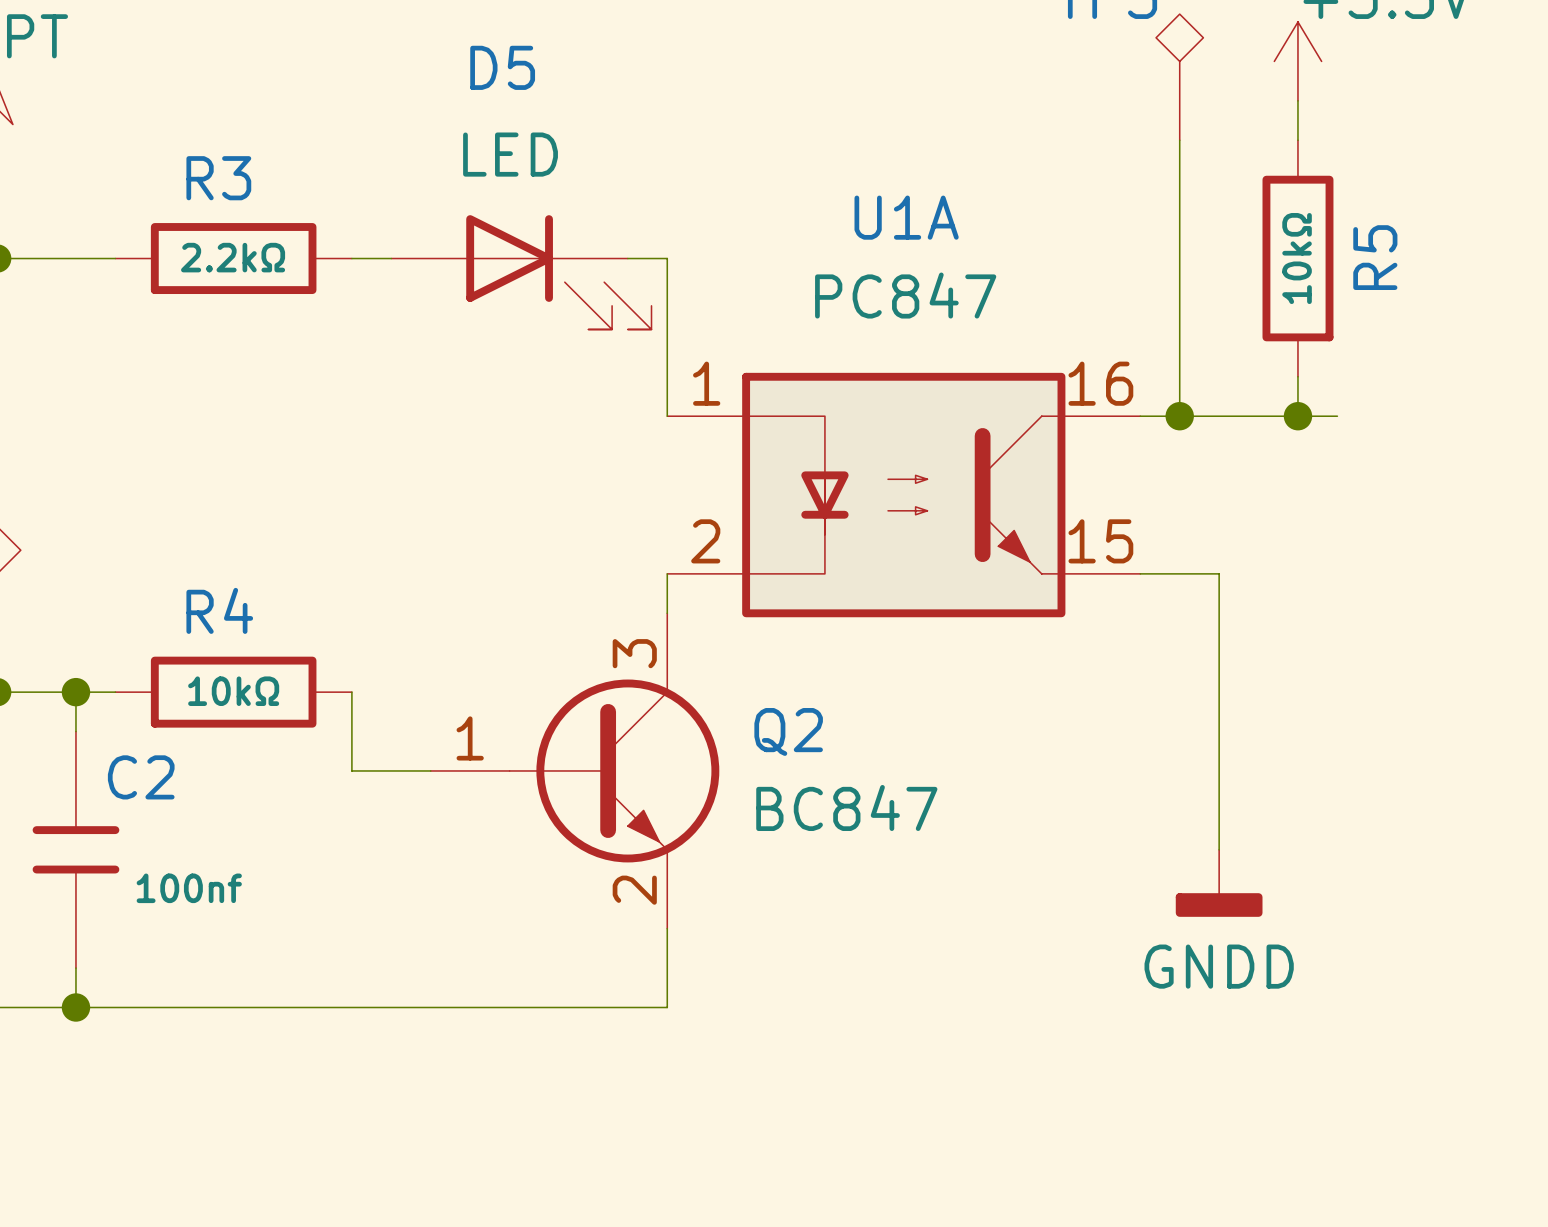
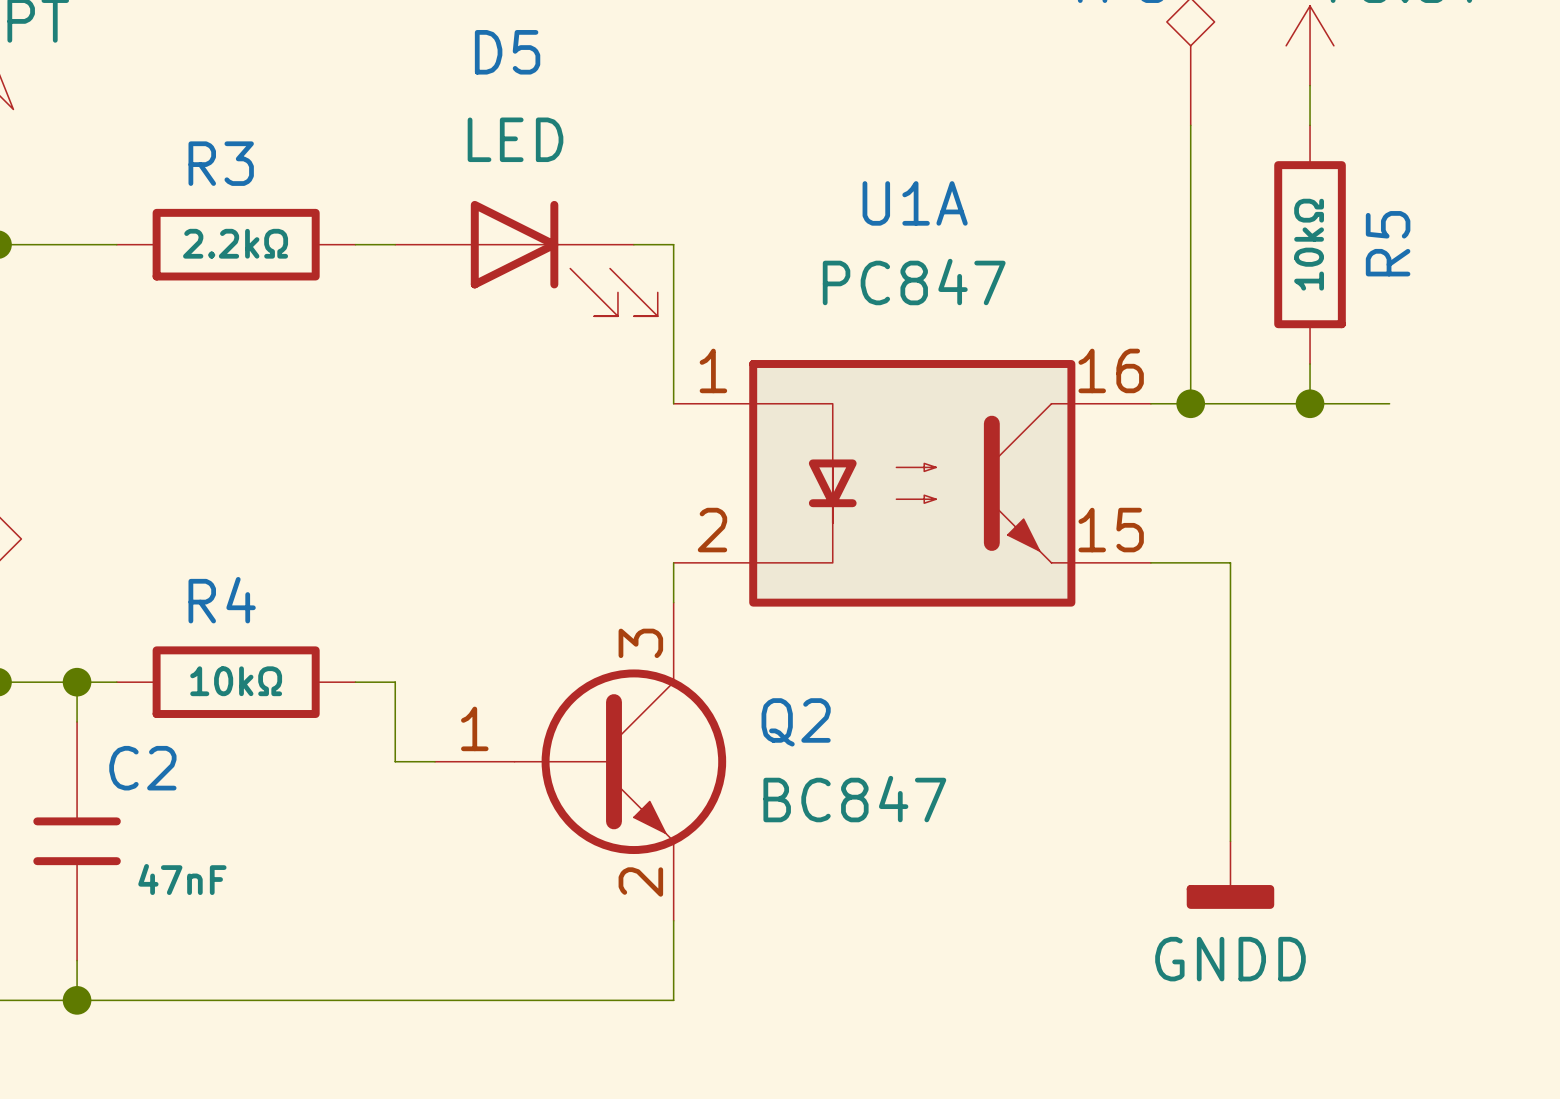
wire: none -> (1349, 403) (1389, 403)
wire: (351, 692) (351, 770) (391, 770) -> (355, 682) (395, 682) (395, 761)
C2 value: 100nf (189, 888) -> 47nF (182, 879)

